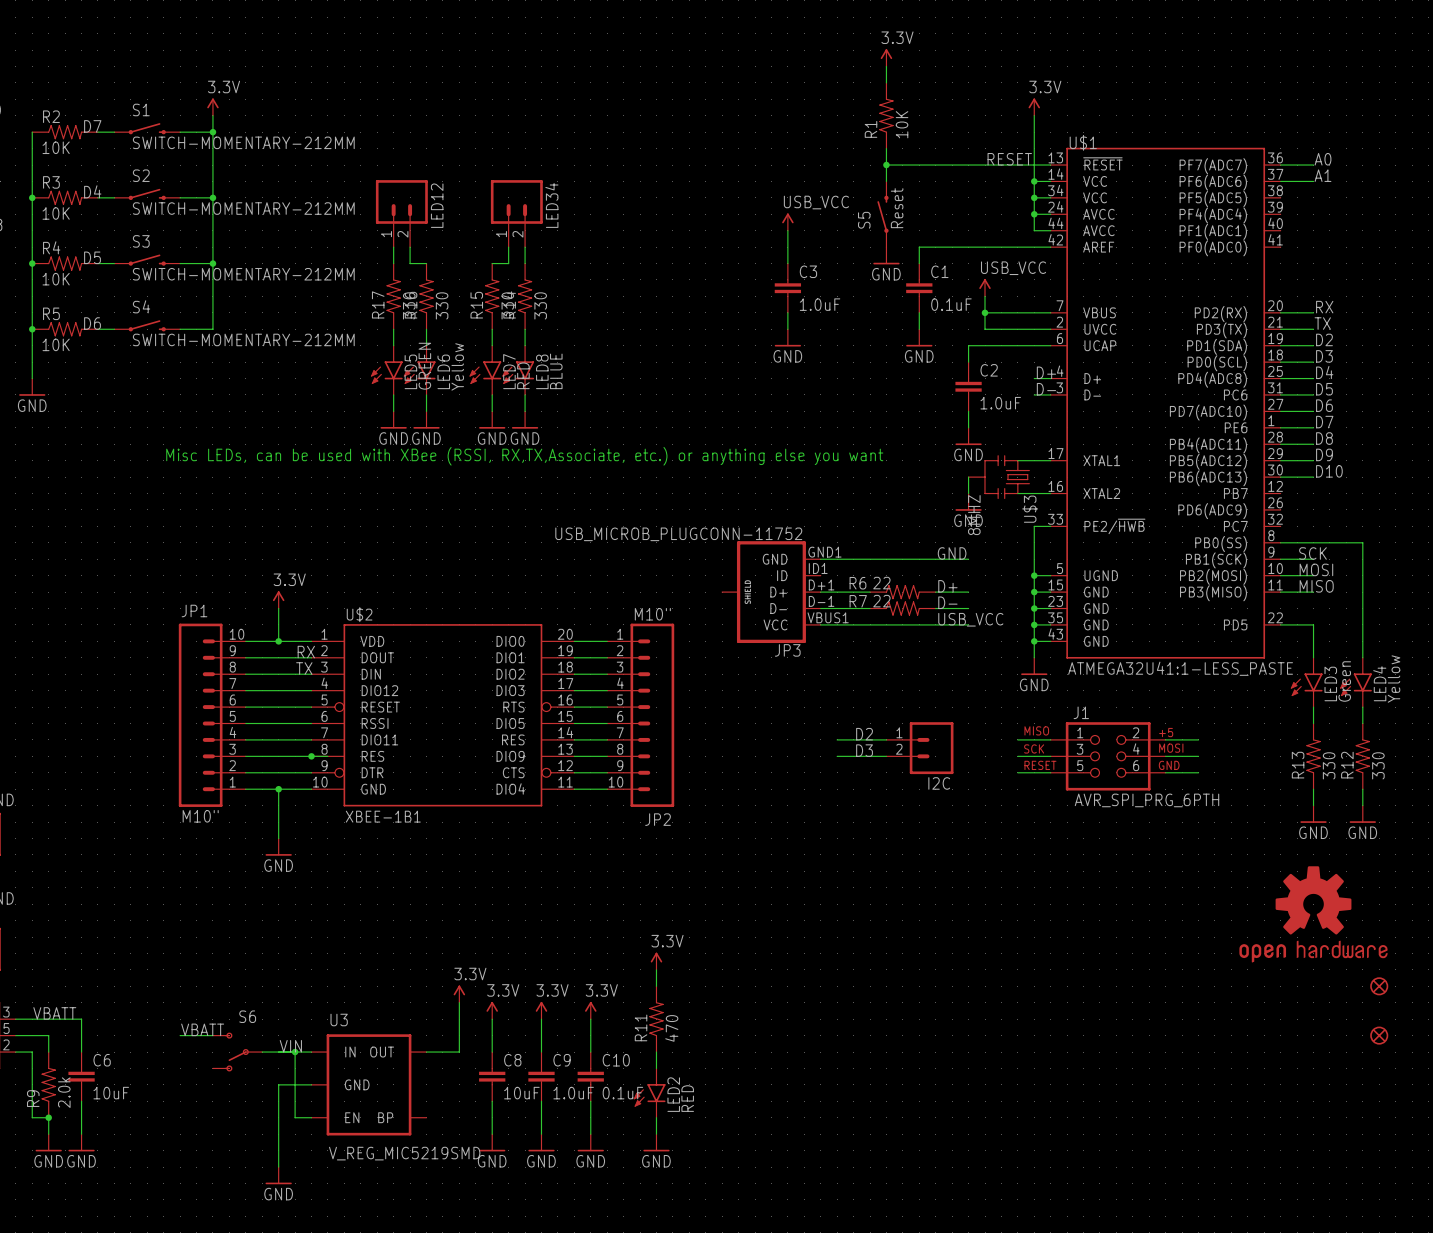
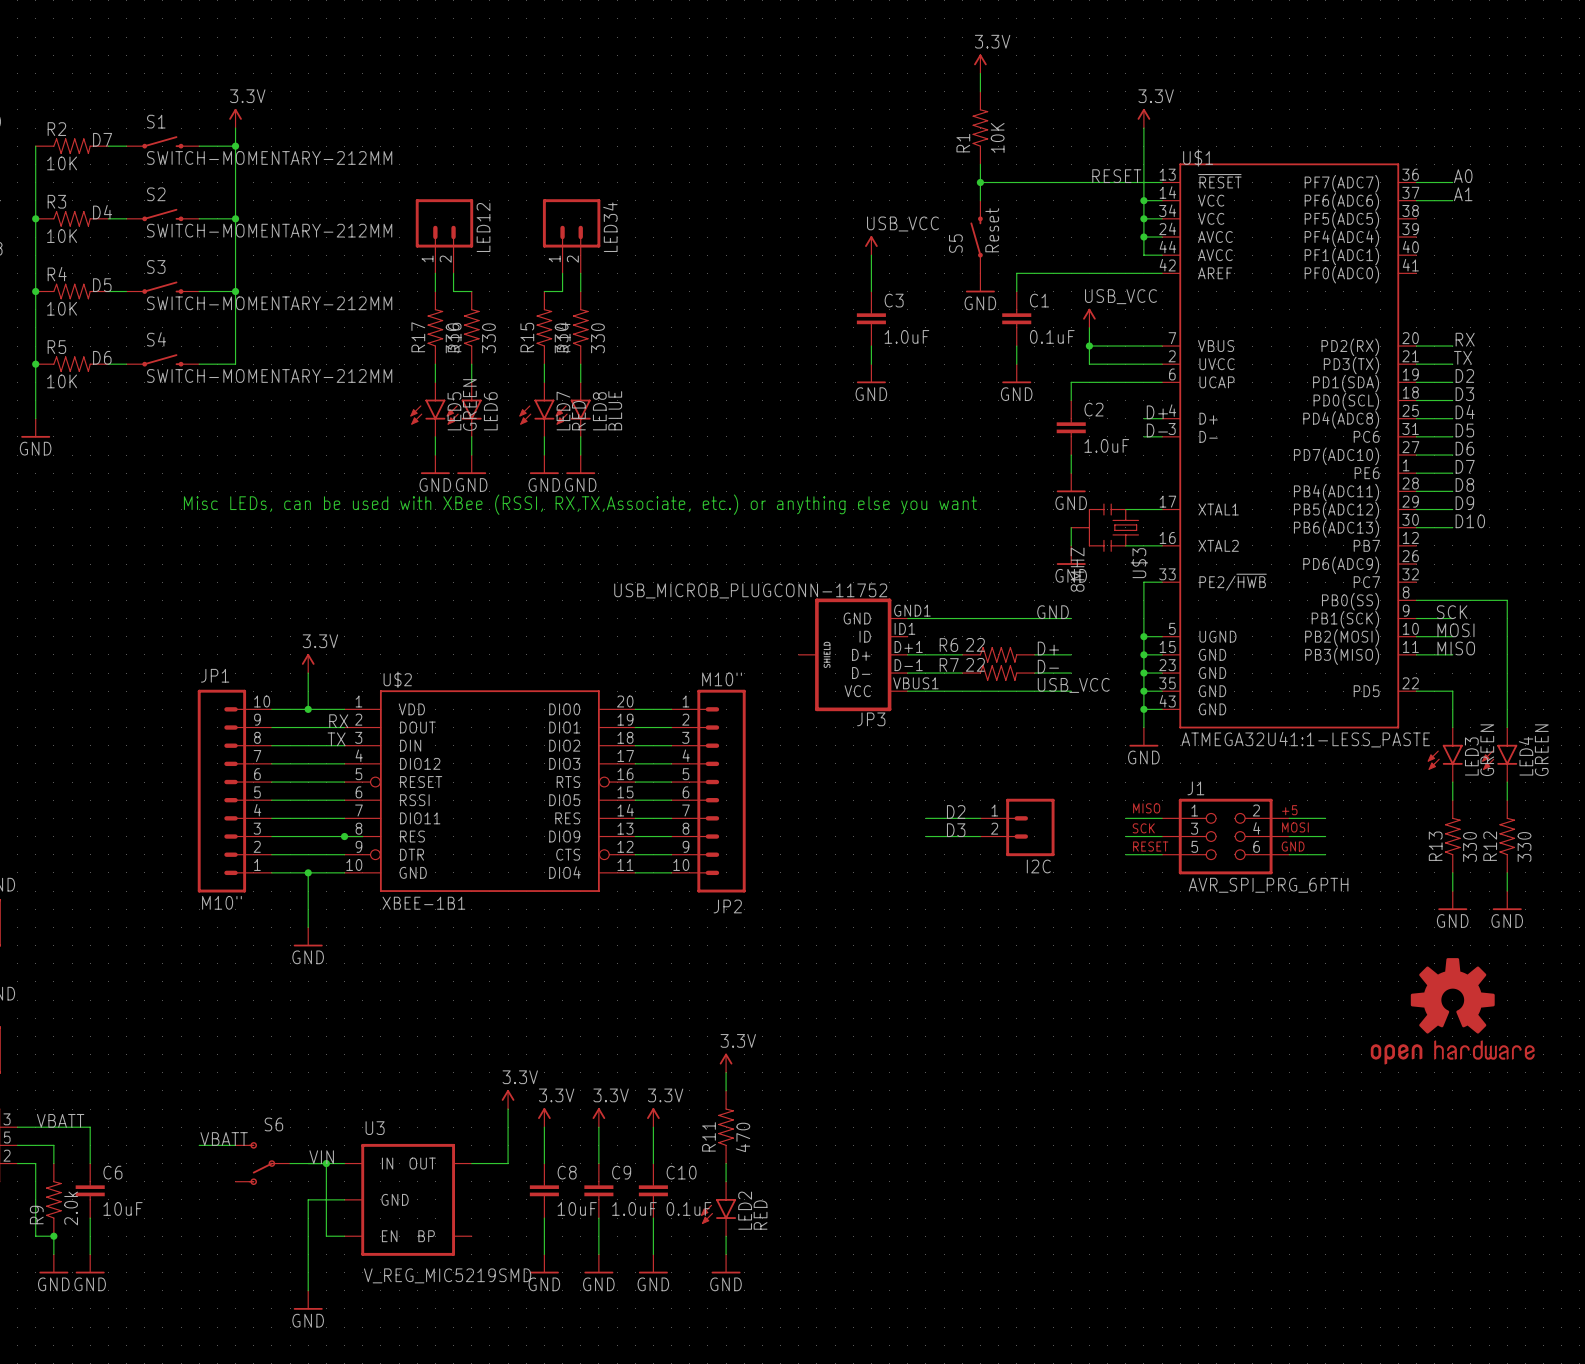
LED6 value: Yellow (457, 366) -> none
LED4 value: Yellow (1394, 679) -> GREEN (1541, 750)
LED3 value: Green (1344, 681) -> GREEN (1487, 750)
part: (1379, 986) -> none
part: (1379, 1035) -> none

